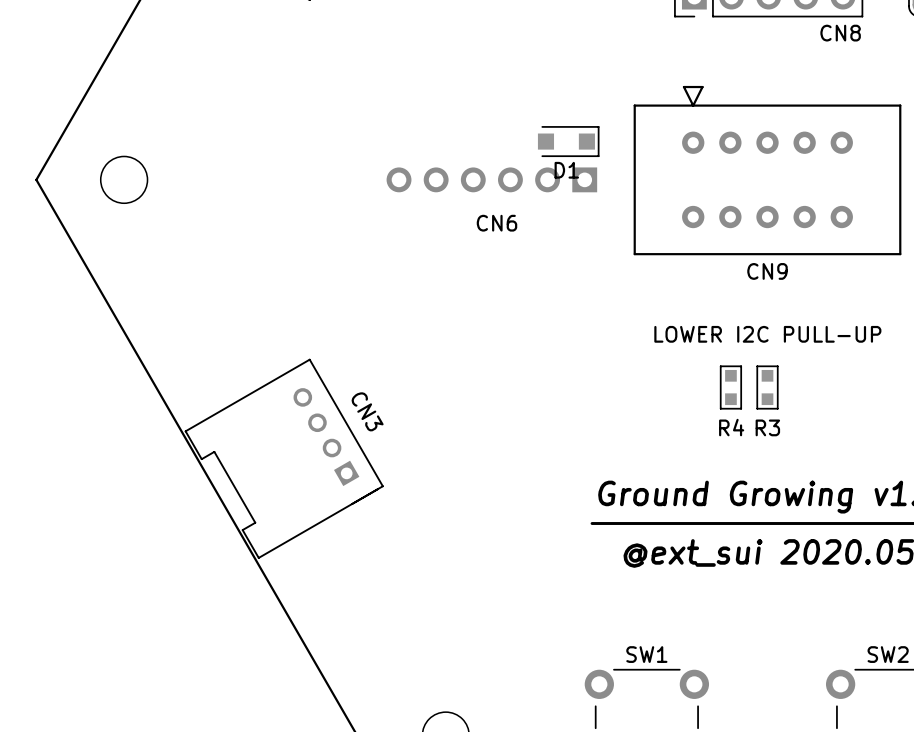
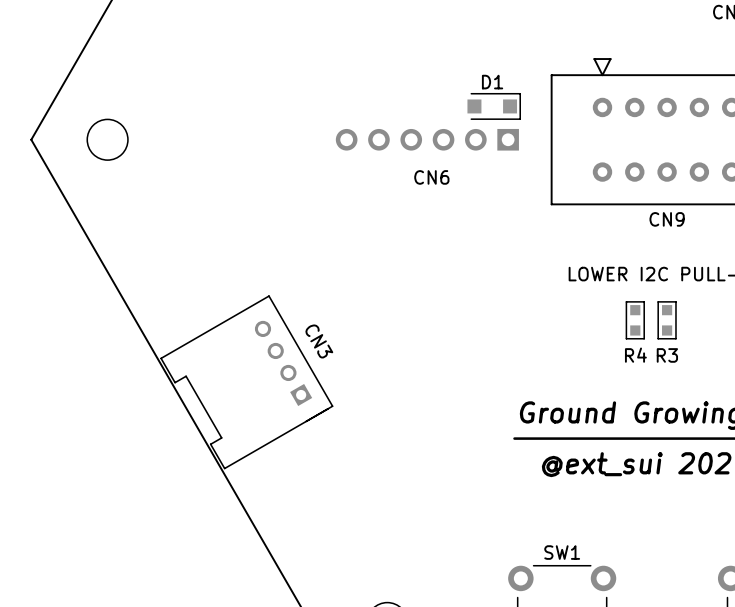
D1 name position: D1 (566, 170) -> D1 (492, 82)

